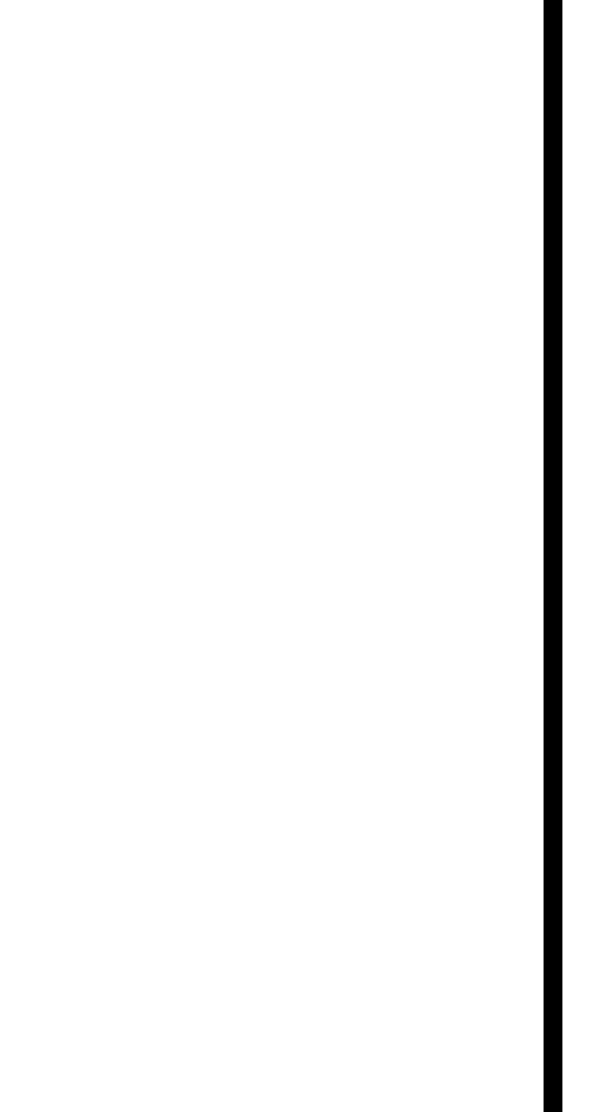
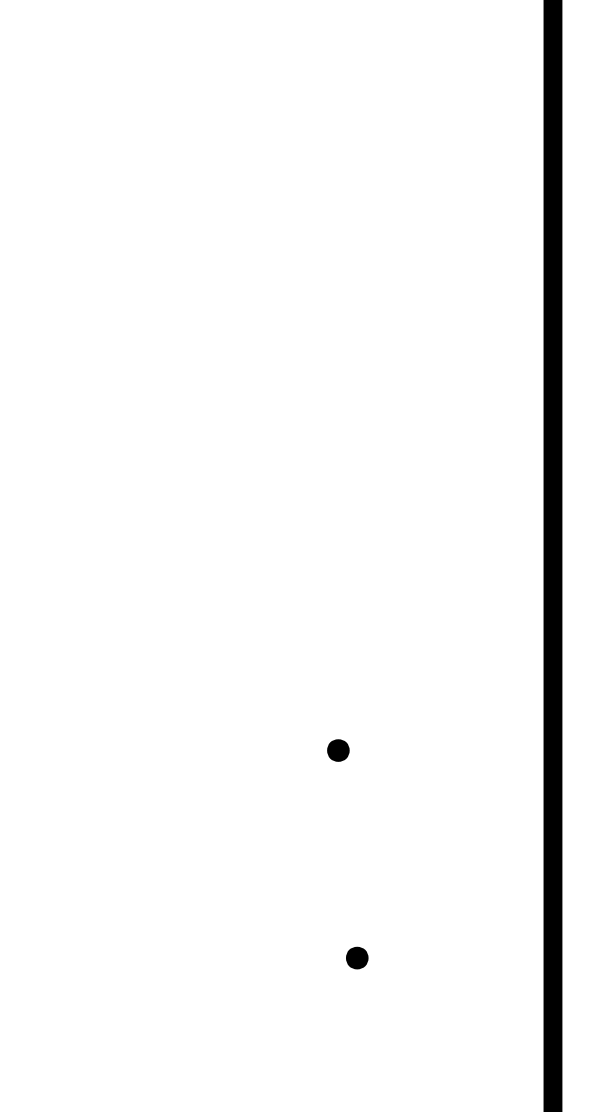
text: none -> . (338, 750)
text: none -> . (357, 958)

